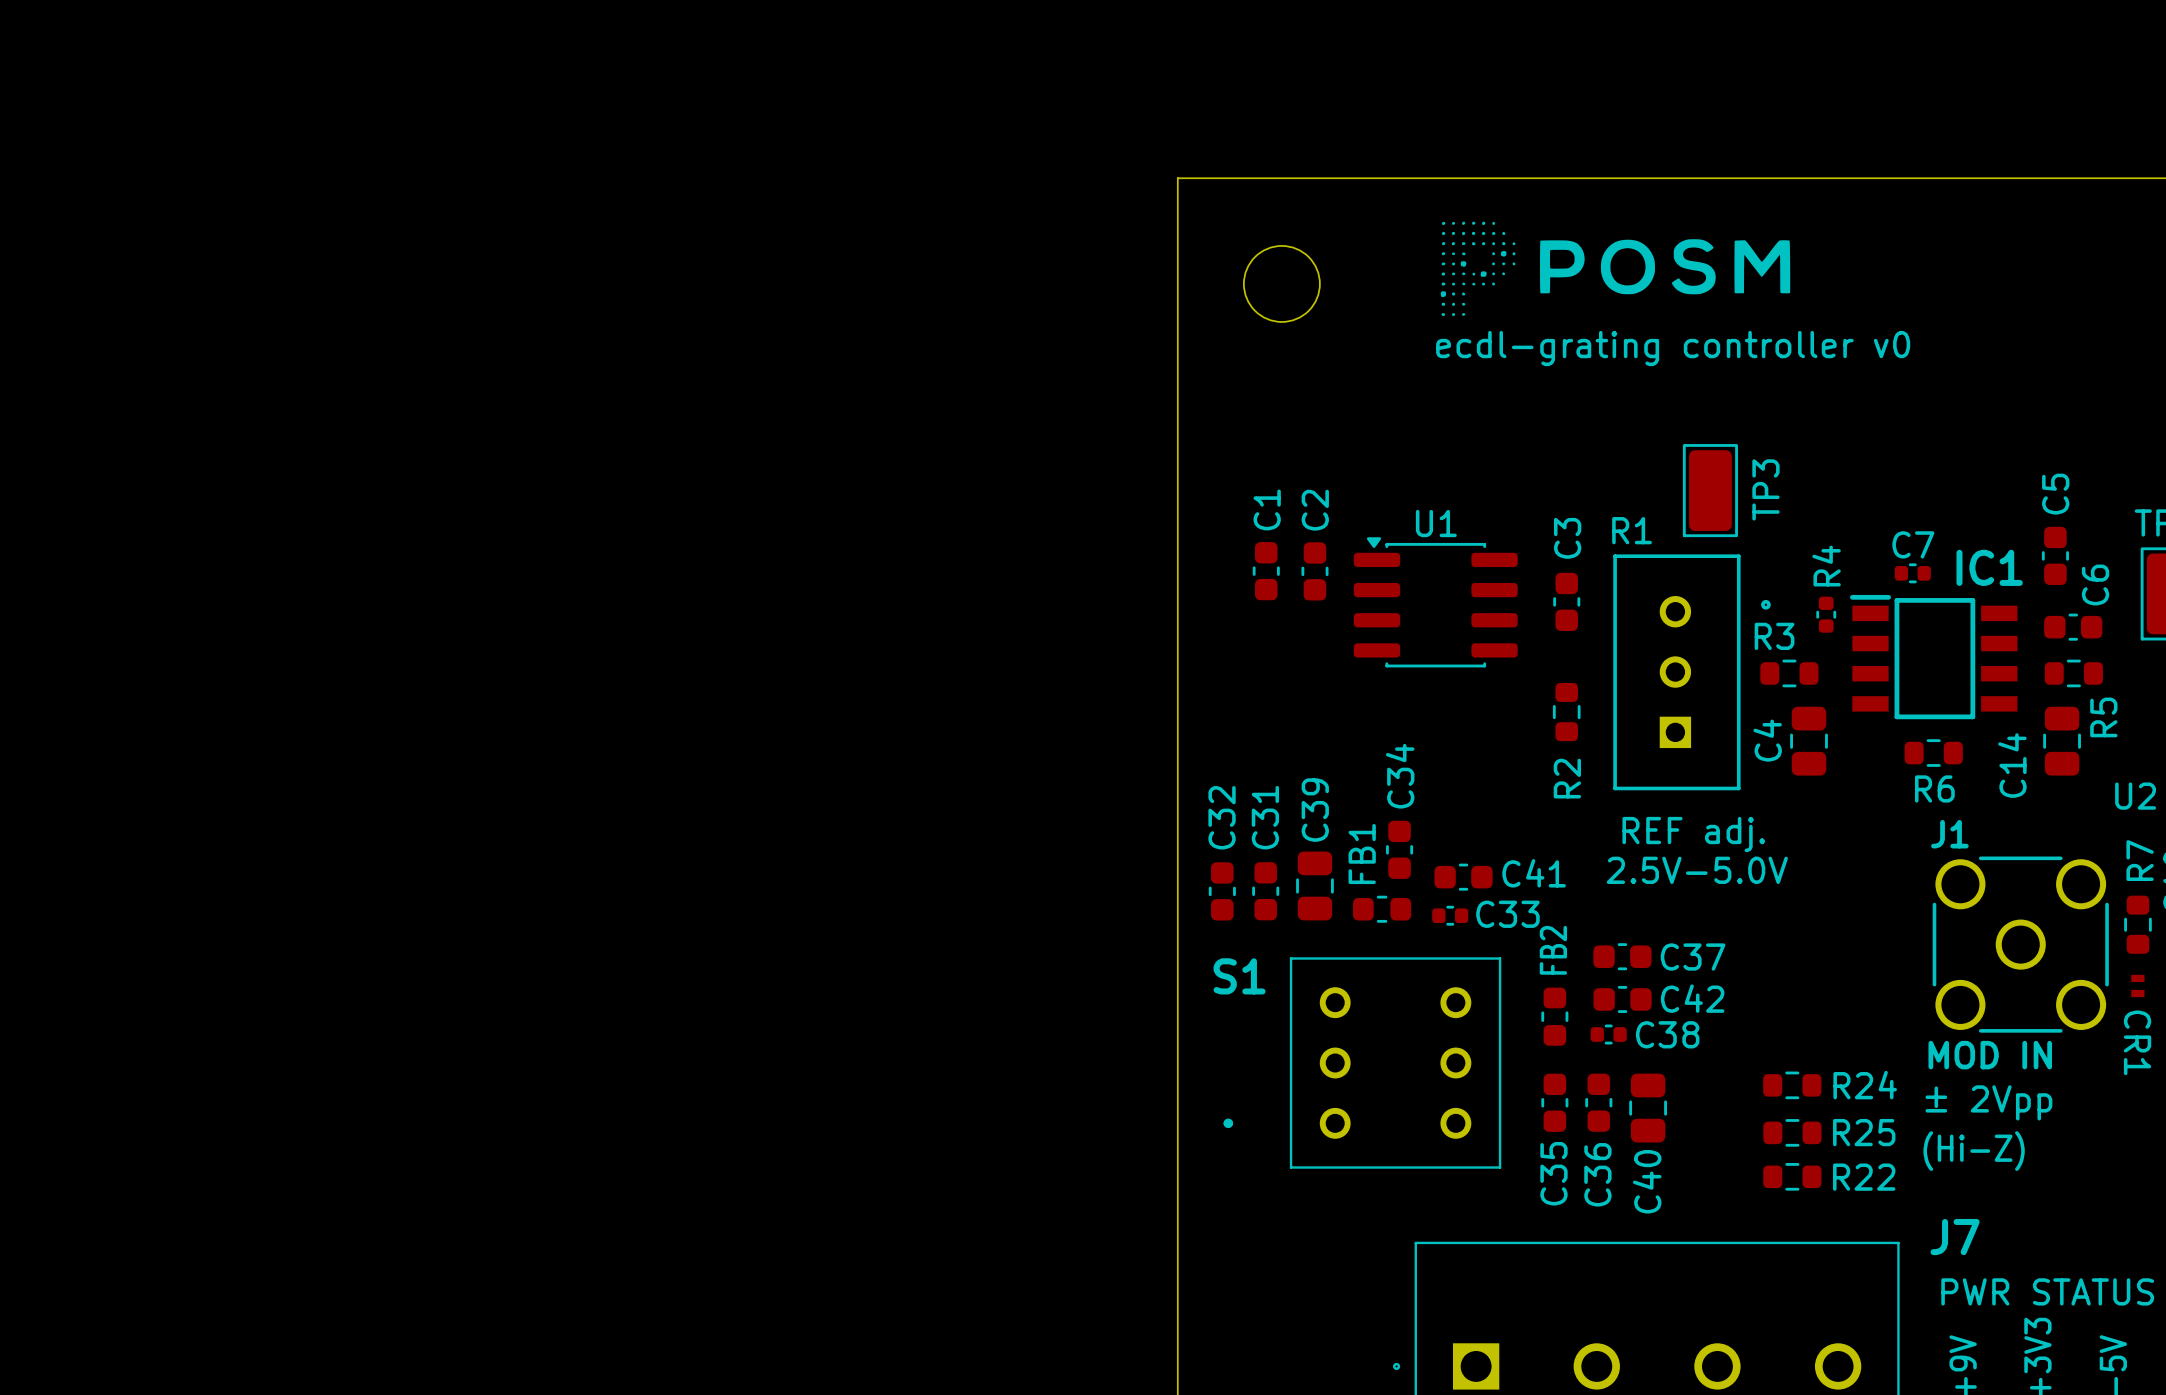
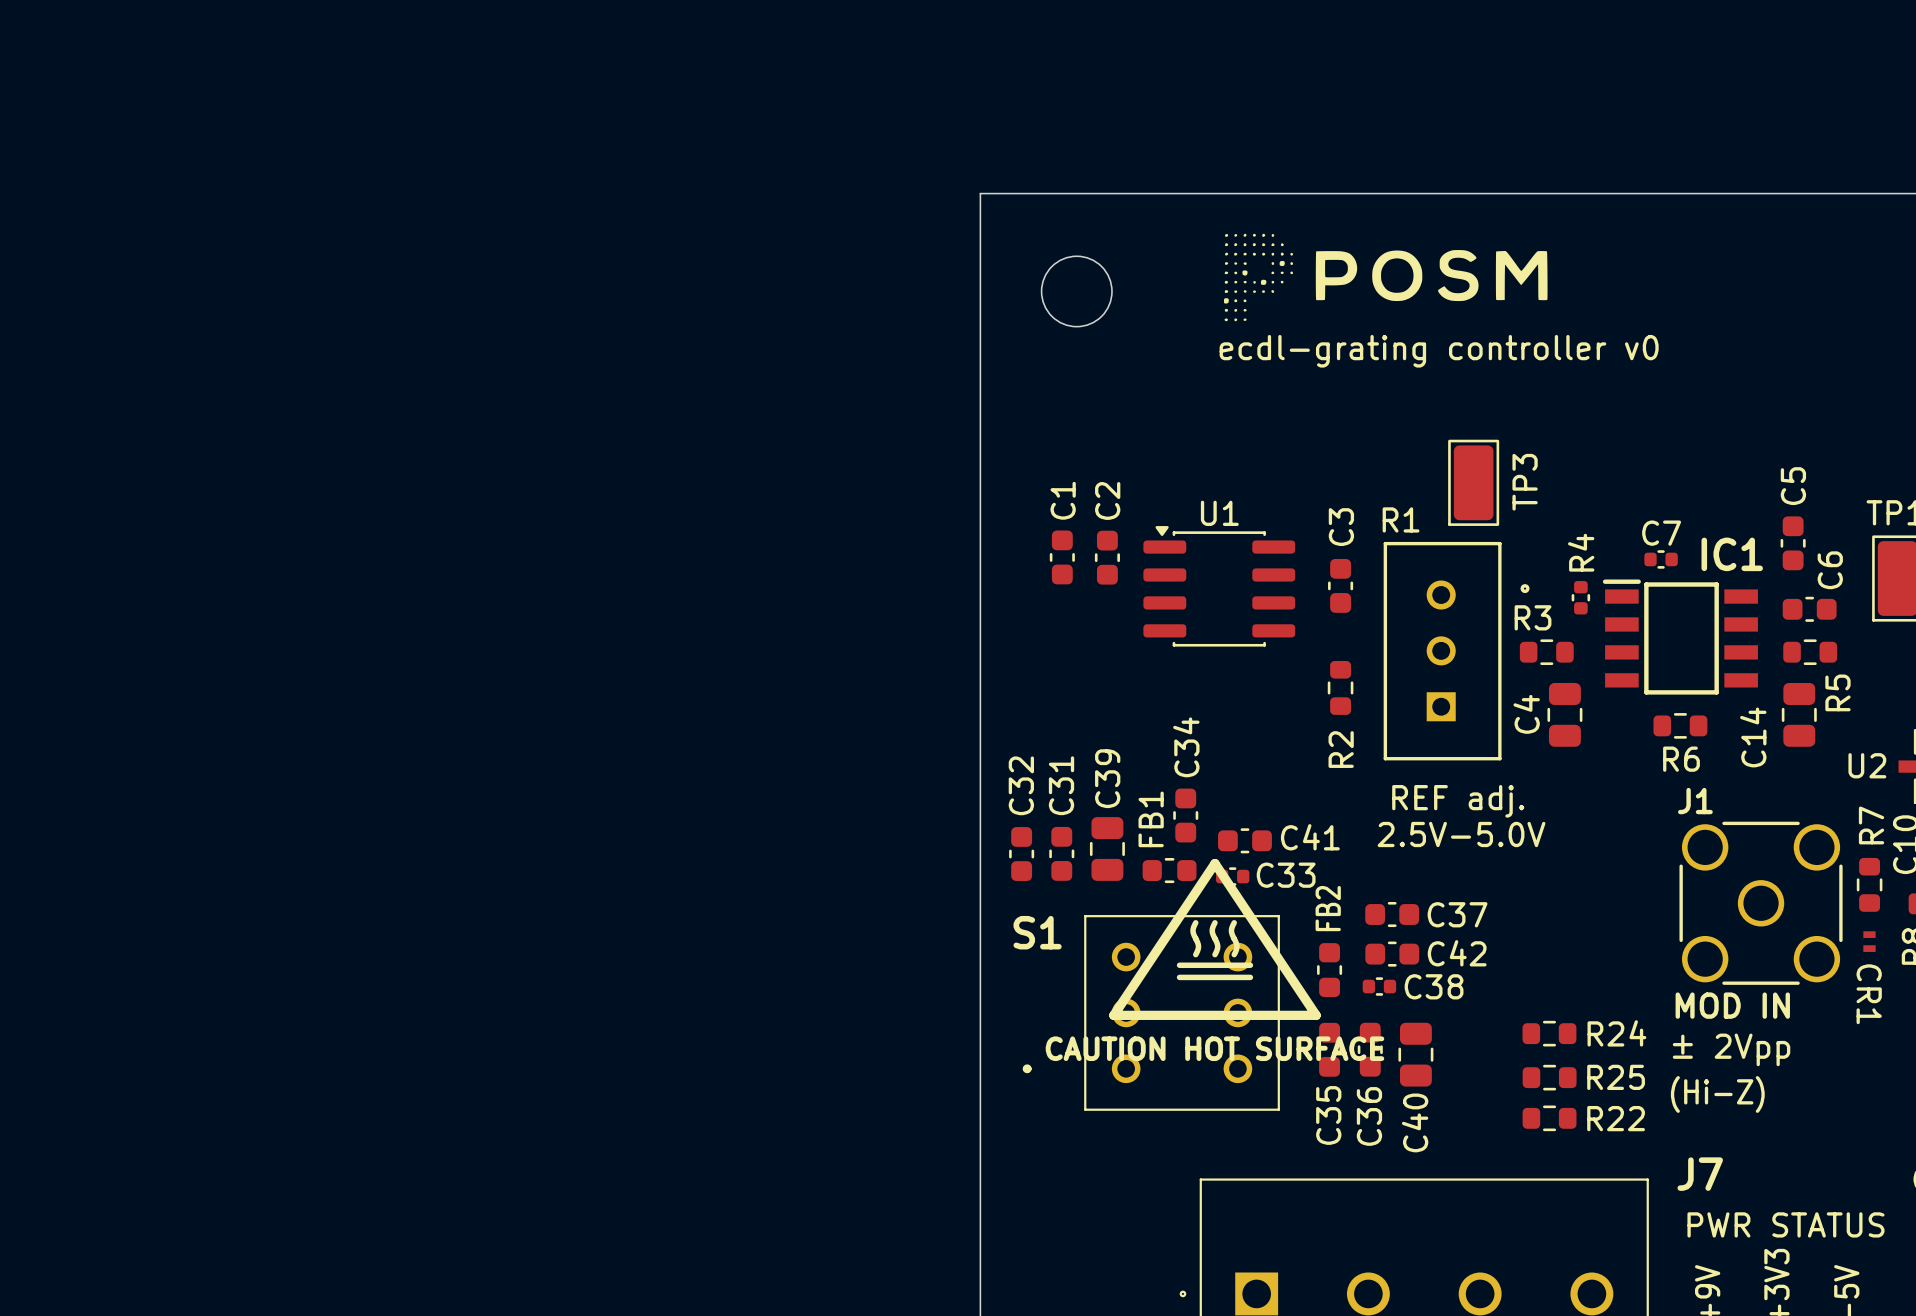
drawing: none -> [1109, 858, 1321, 1020]

